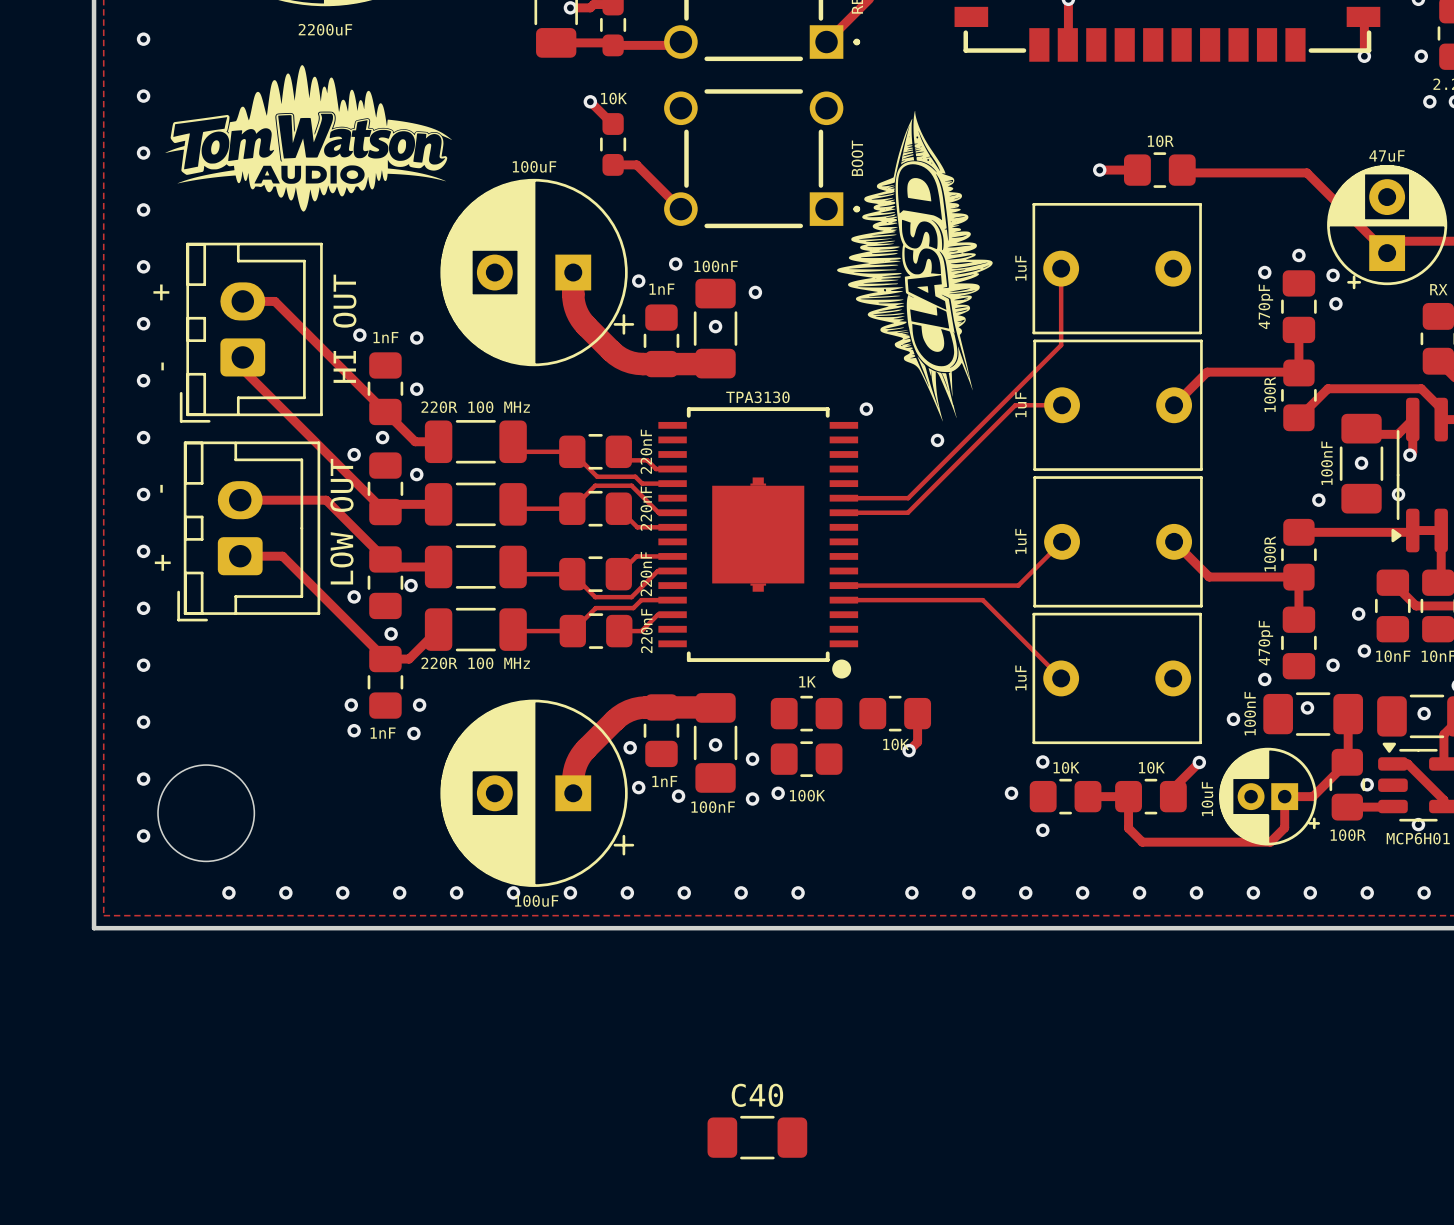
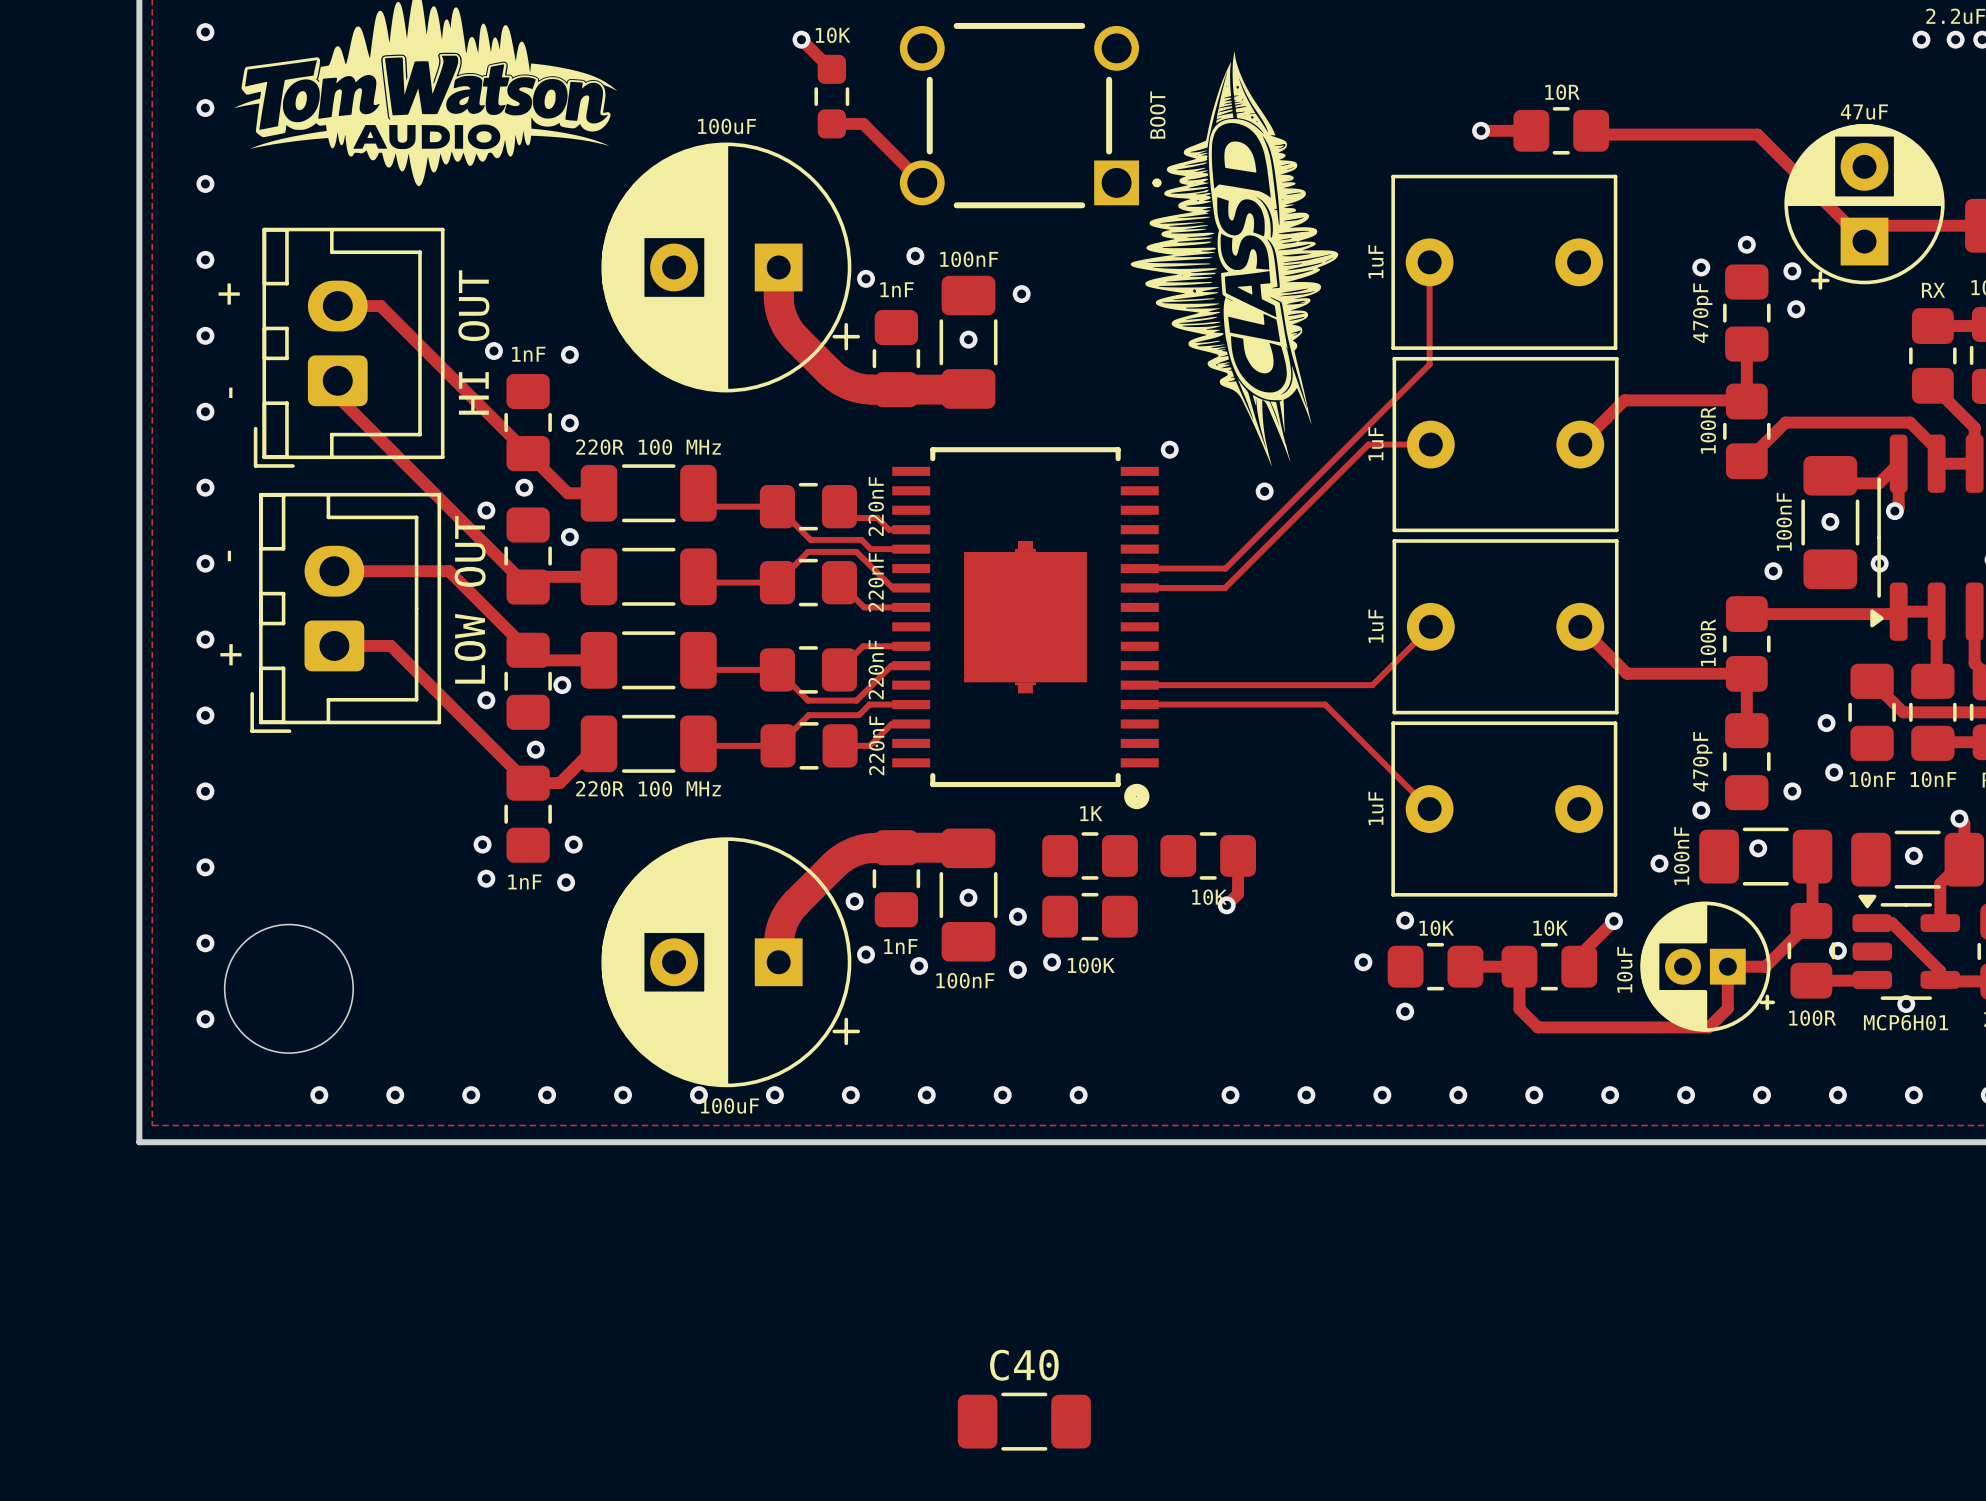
part value: TPA3130 (757, 397) -> none

